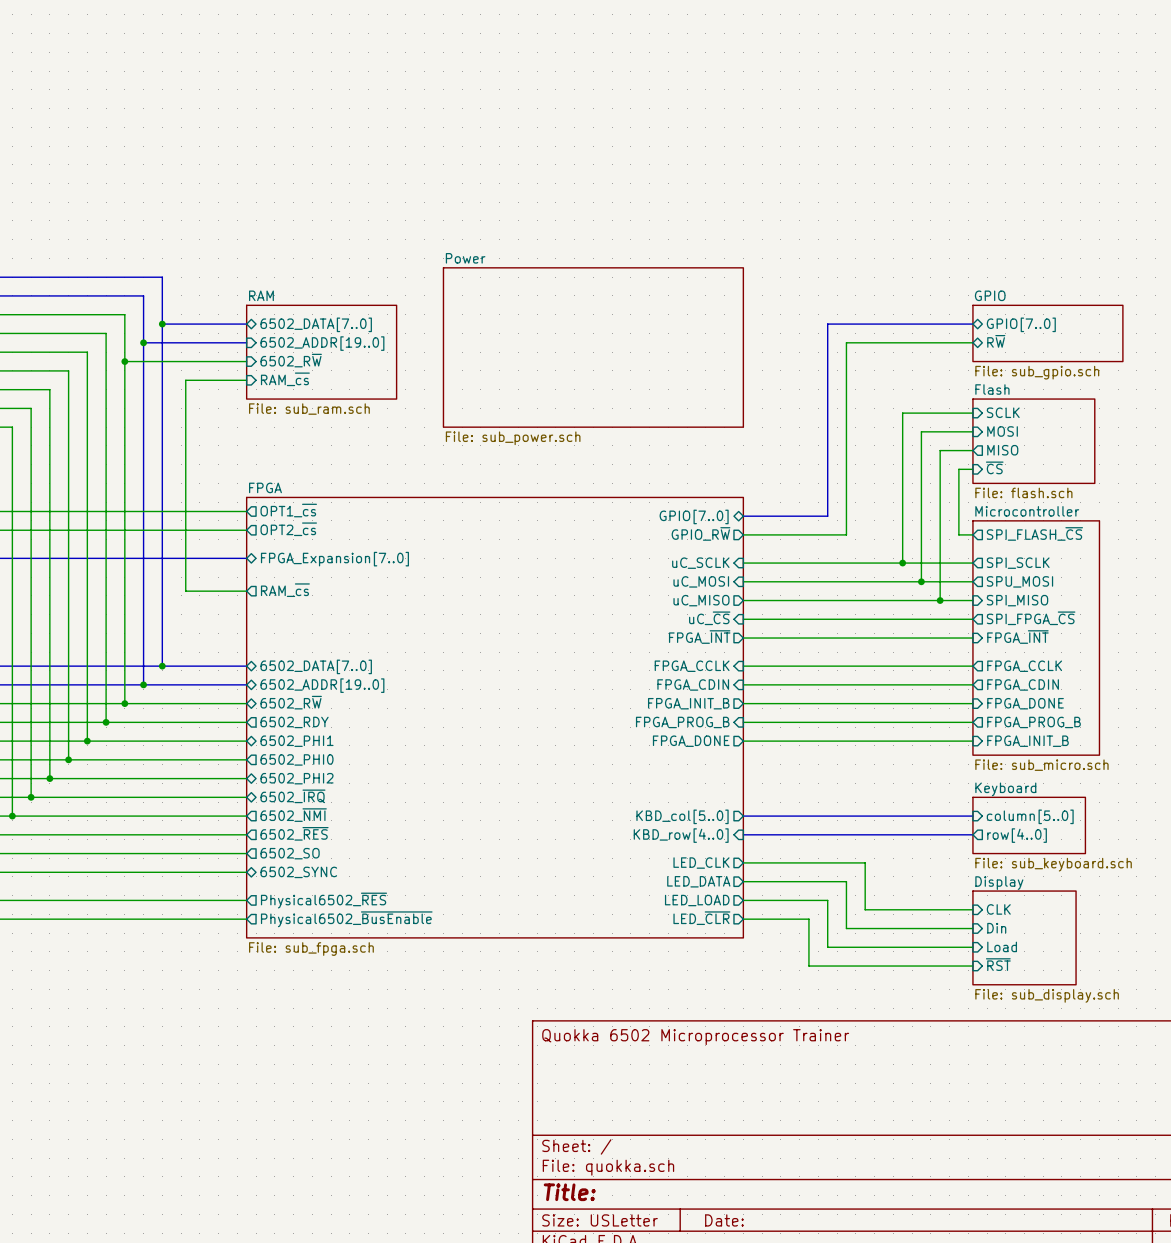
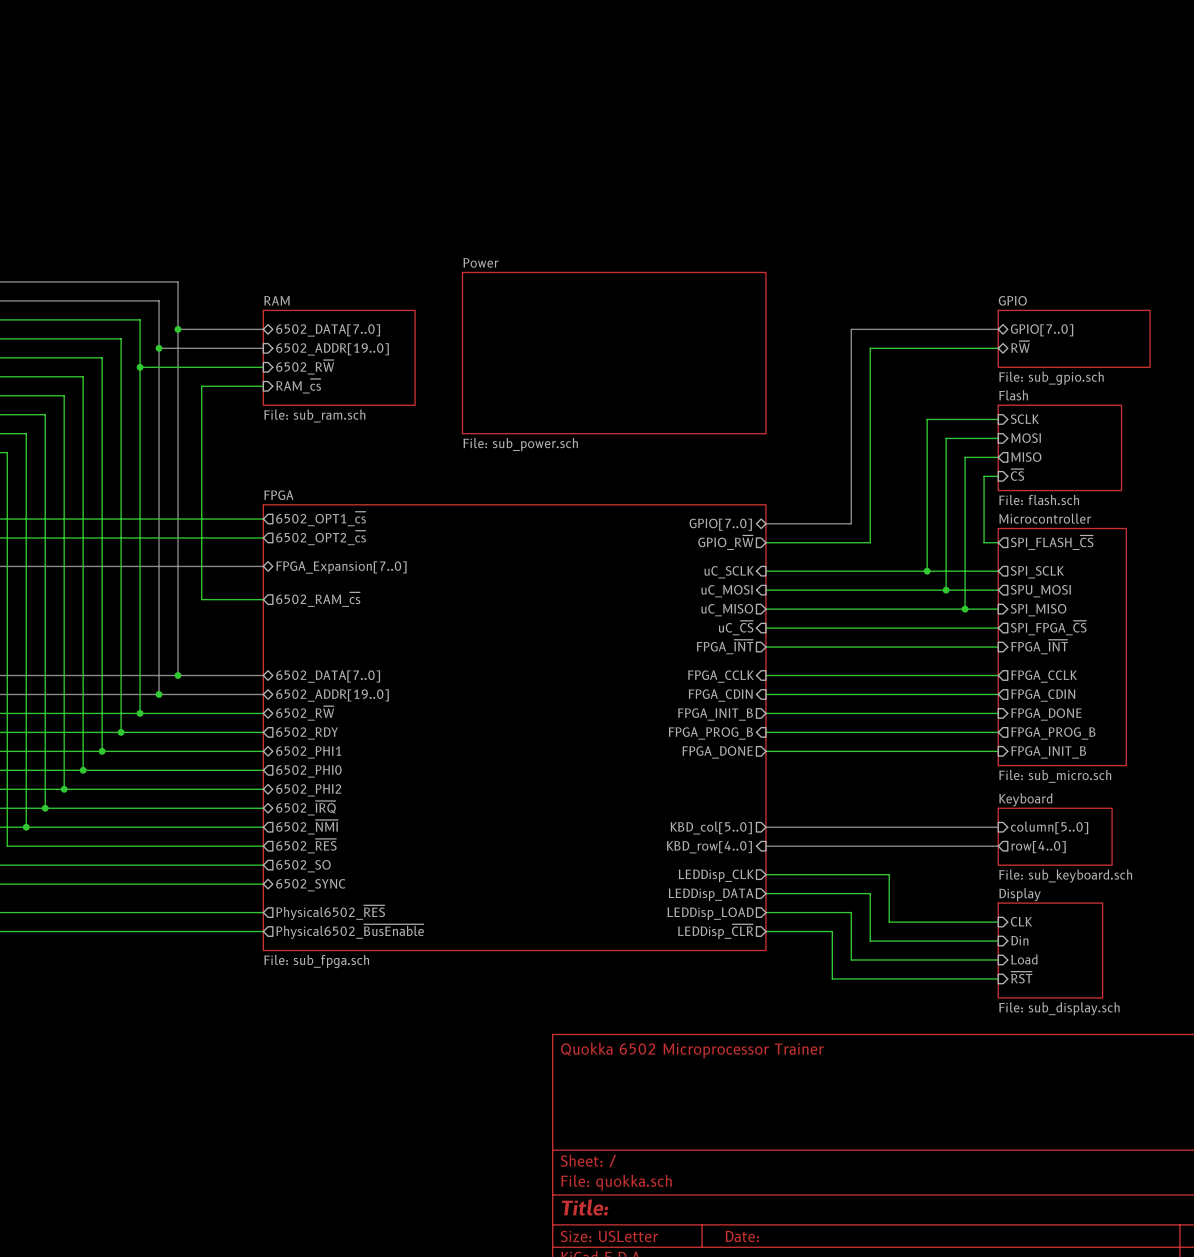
sheet pin: OPT1_~{cs} (288, 510) -> 6502_OPT1_~{cs} (321, 519)
sheet pin: OPT2_~{cs} (288, 529) -> 6502_OPT2_~{cs} (321, 537)
sheet pin: RAM_~{cs} (285, 590) -> 6502_RAM_~{cs} (318, 599)
sheet pin: LED_CLK (701, 863) -> LEDDisp_CLK (716, 875)
sheet pin: LED_DATA (698, 881) -> LEDDisp_DATA (711, 894)
sheet pin: LED_LOAD (697, 900) -> LEDDisp_LOAD (710, 913)
sheet pin: LED_~{CLR} (701, 918) -> LEDDisp_~{CLR} (715, 931)

